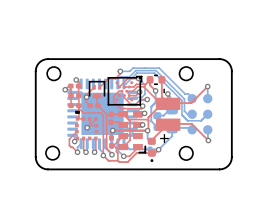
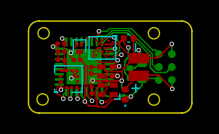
part footprint: [75, 110, 99, 141] -> [53, 65, 83, 94]

